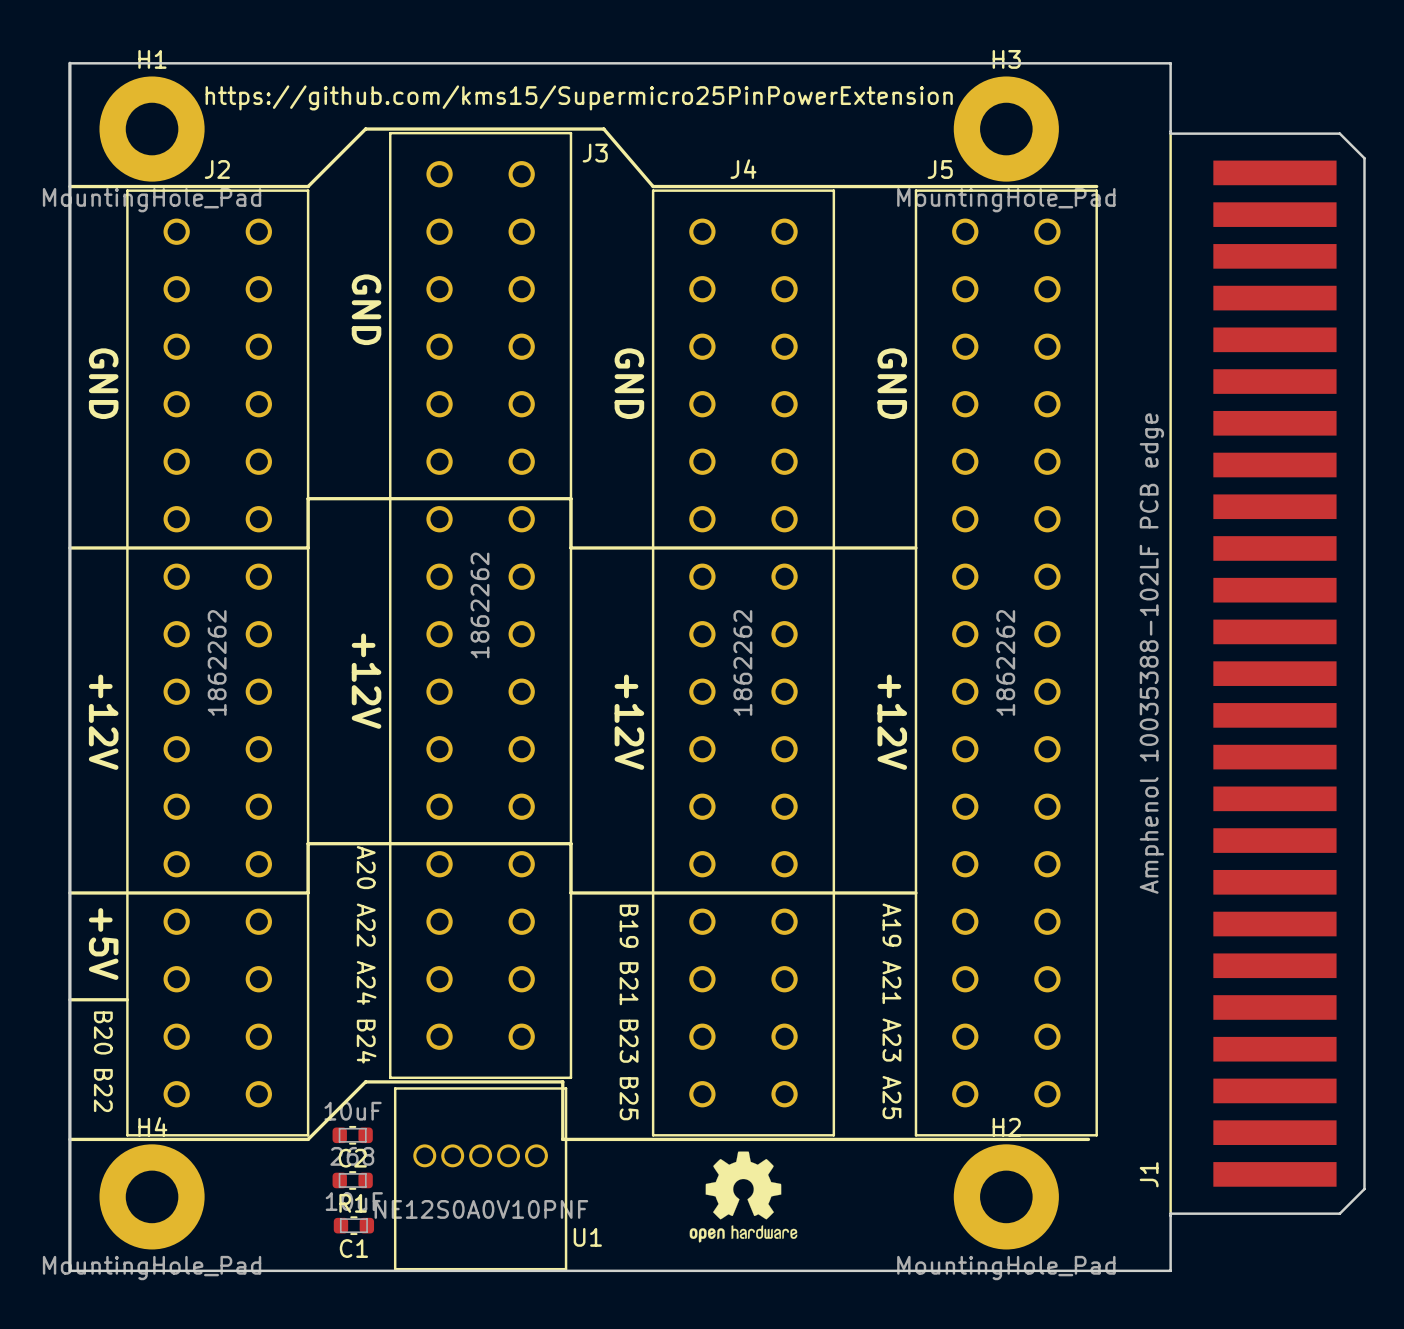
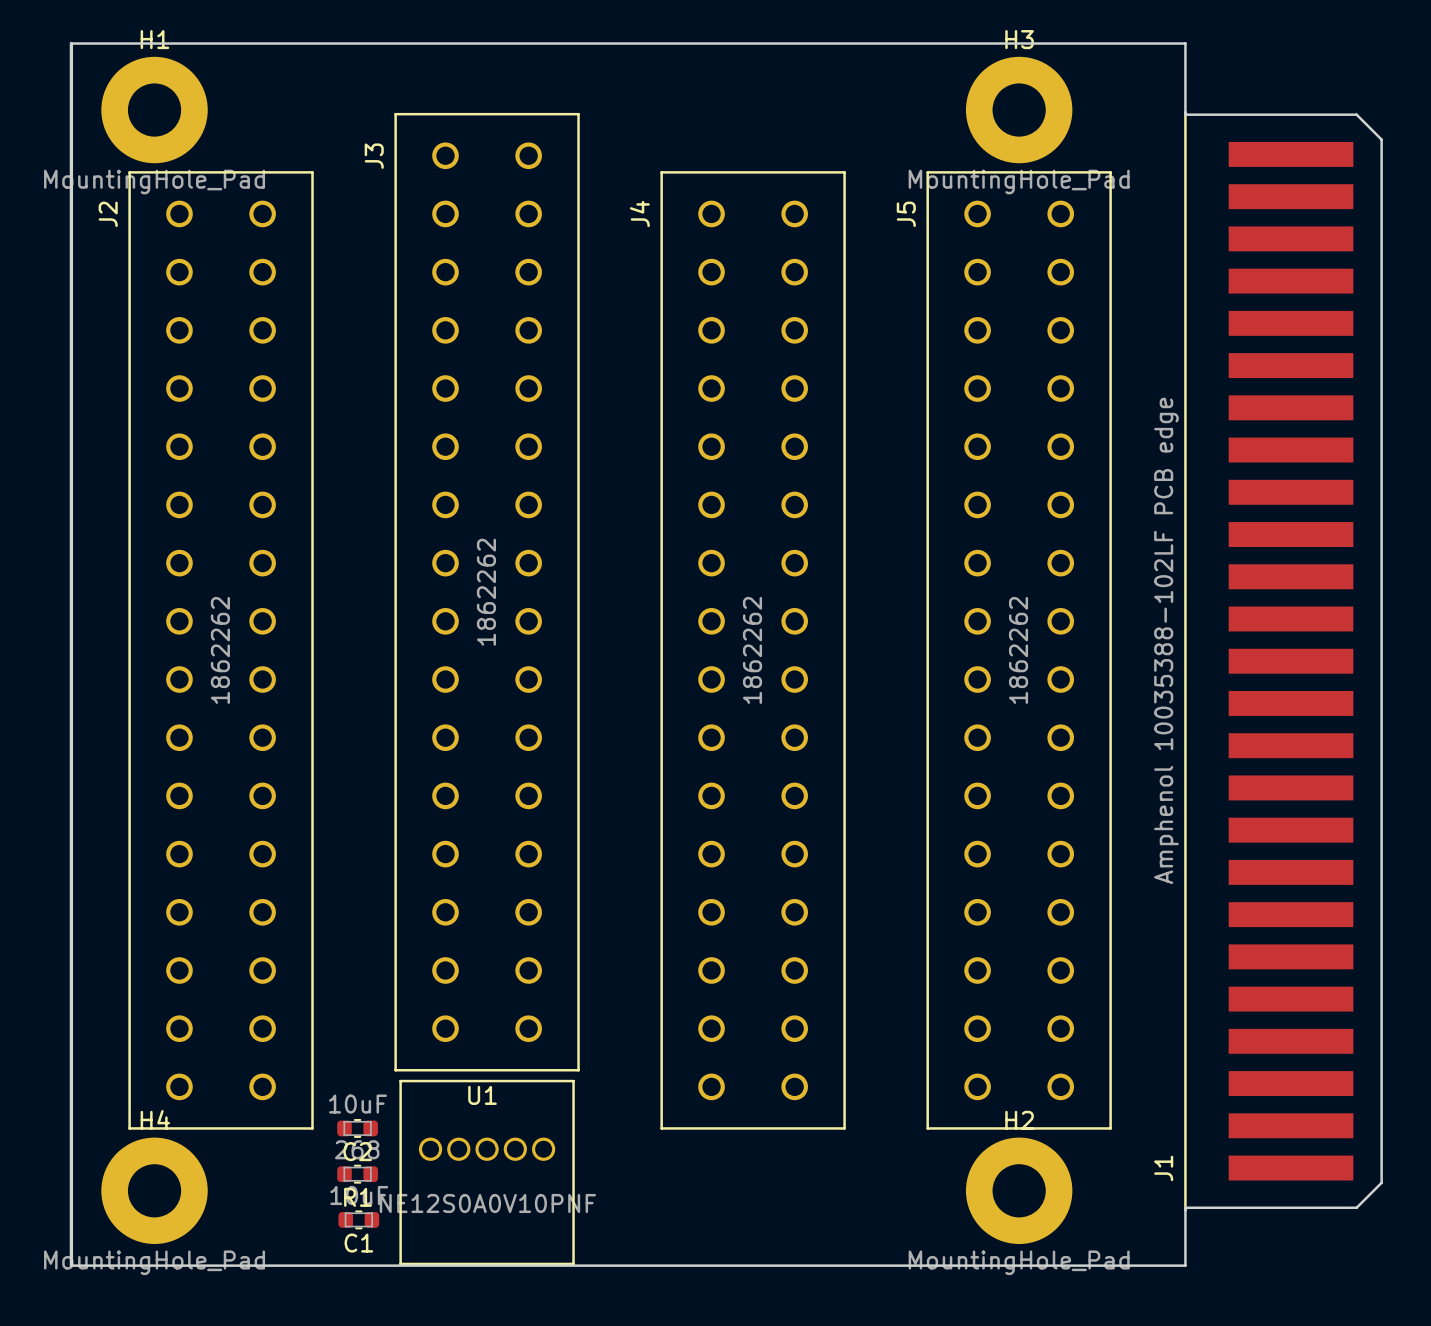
text: https://github.com/kms15/Supermicro25PinPowerExtension (579, 97) -> none
J3 name rotation: 0° (595, 153) -> 90° counterclockwise (374, 156)
J3 name position: J3 (595, 153) -> J3 (374, 156)
J2 name rotation: 0° (217, 169) -> 90° counterclockwise (108, 214)
J2 name position: J2 (217, 169) -> J2 (108, 214)
J4 name rotation: 0° (743, 169) -> 90° counterclockwise (639, 213)
J4 name position: J4 (743, 169) -> J4 (639, 213)
J5 name rotation: 0° (940, 169) -> 90° counterclockwise (906, 214)
J5 name position: J5 (940, 169) -> J5 (906, 214)
line: (69, 186) (308, 186) (365, 129) (603, 129) (653, 186) (1096, 186) -> none
text: GND (366, 309) -> none
text: GND (103, 383) -> none
text: GND (629, 383) -> none
text: GND (892, 383) -> none
line: (69, 547) (308, 547) (308, 498) (570, 498) (570, 547) (915, 547) -> none
text: +12V (366, 681) -> none
text: +12V (103, 722) -> none
text: +12V (629, 722) -> none
text: +12V (892, 722) -> none
text: A20 (366, 867) -> none
line: (69, 892) (308, 892) (308, 843) (570, 843) (570, 892) (915, 892) -> none
text: A22 (366, 925) -> none
text: A19 (891, 925) -> none
text: B19 (629, 926) -> none
text: +5V (103, 944) -> none
text: A24 (366, 982) -> none
text: A21 (891, 982) -> none
text: B21 (629, 983) -> none
line: (69, 999) (127, 999) -> none
text: B20 (103, 1033) -> none
text: A23 (891, 1040) -> none
text: B24 (366, 1041) -> none
text: B23 (629, 1041) -> none
text: B22 (103, 1090) -> none
text: A25 (891, 1097) -> none
text: B25 (629, 1098) -> none
line: (69, 1139) (308, 1139) (365, 1081) (562, 1081) (562, 1139) (1088, 1139) -> none
drawing: [689, 1151, 798, 1243] -> none
U1 name position: U1 (587, 1237) -> U1 (482, 1095)

